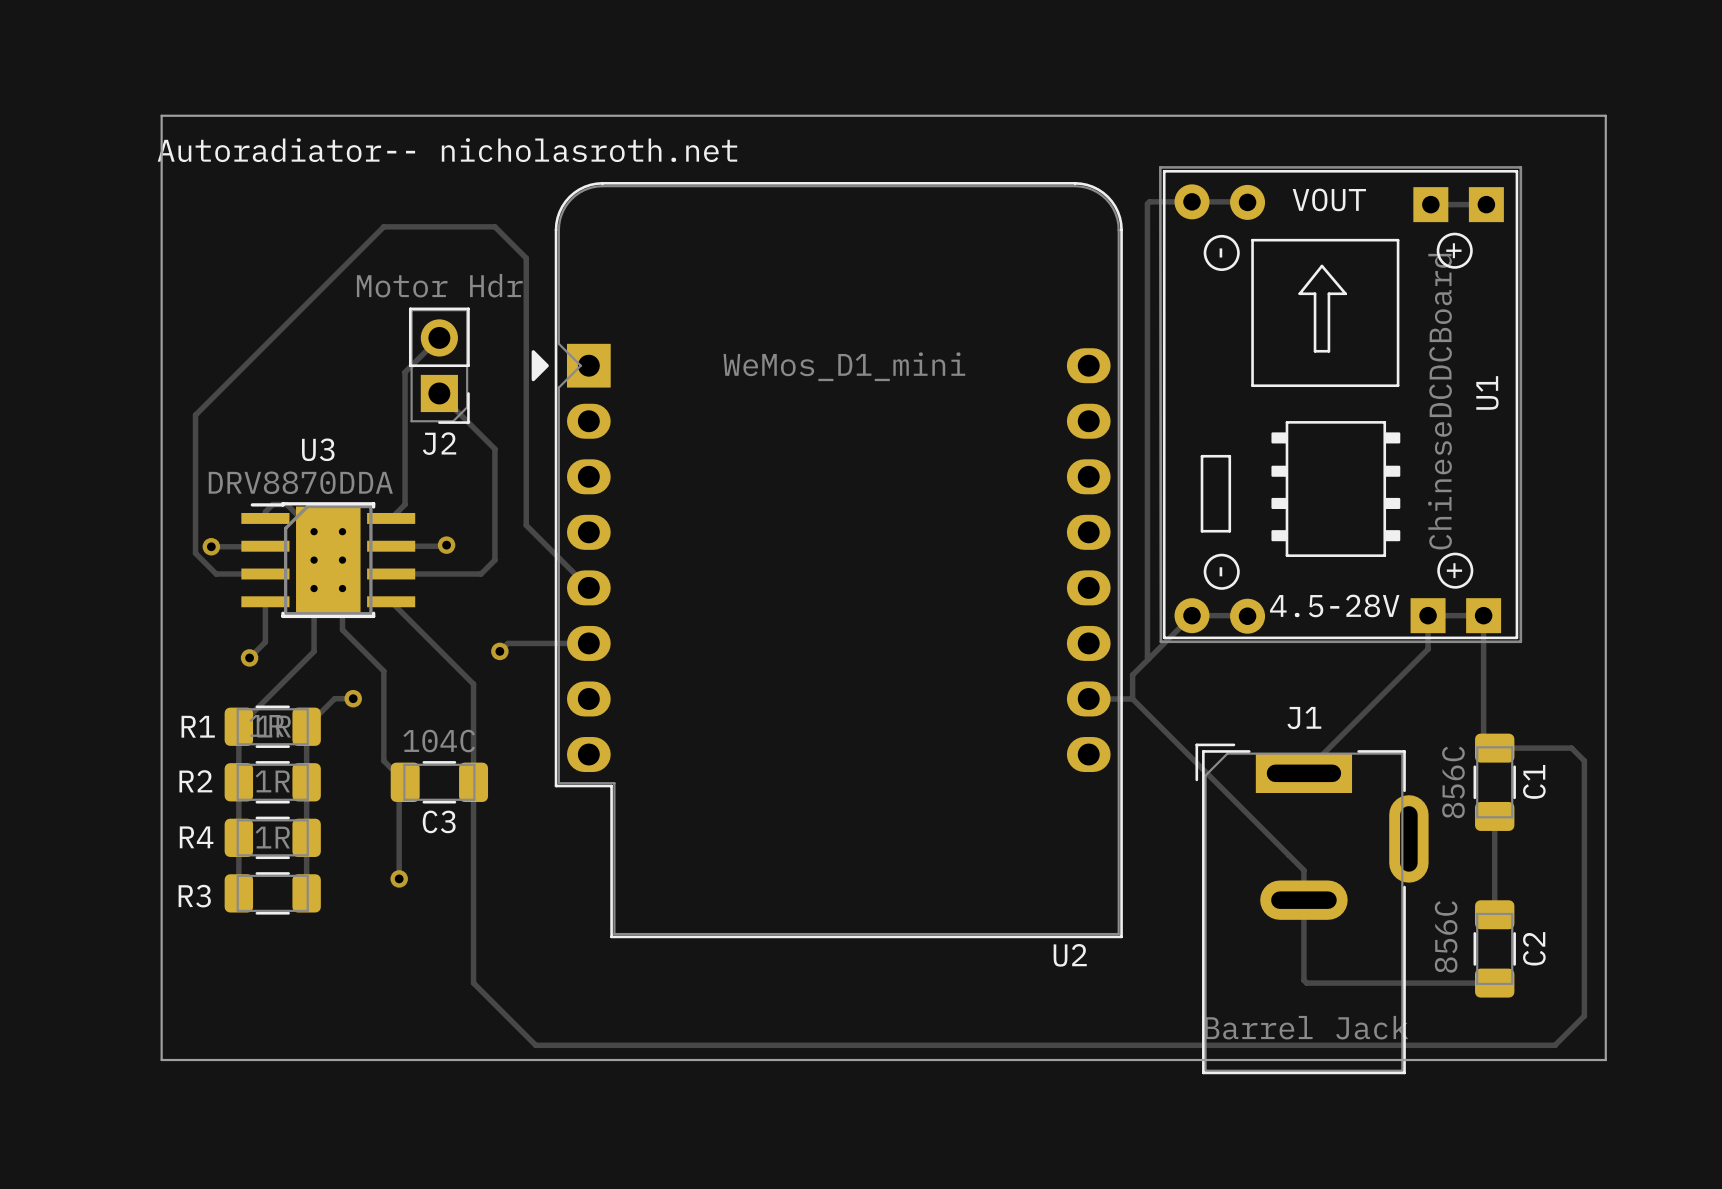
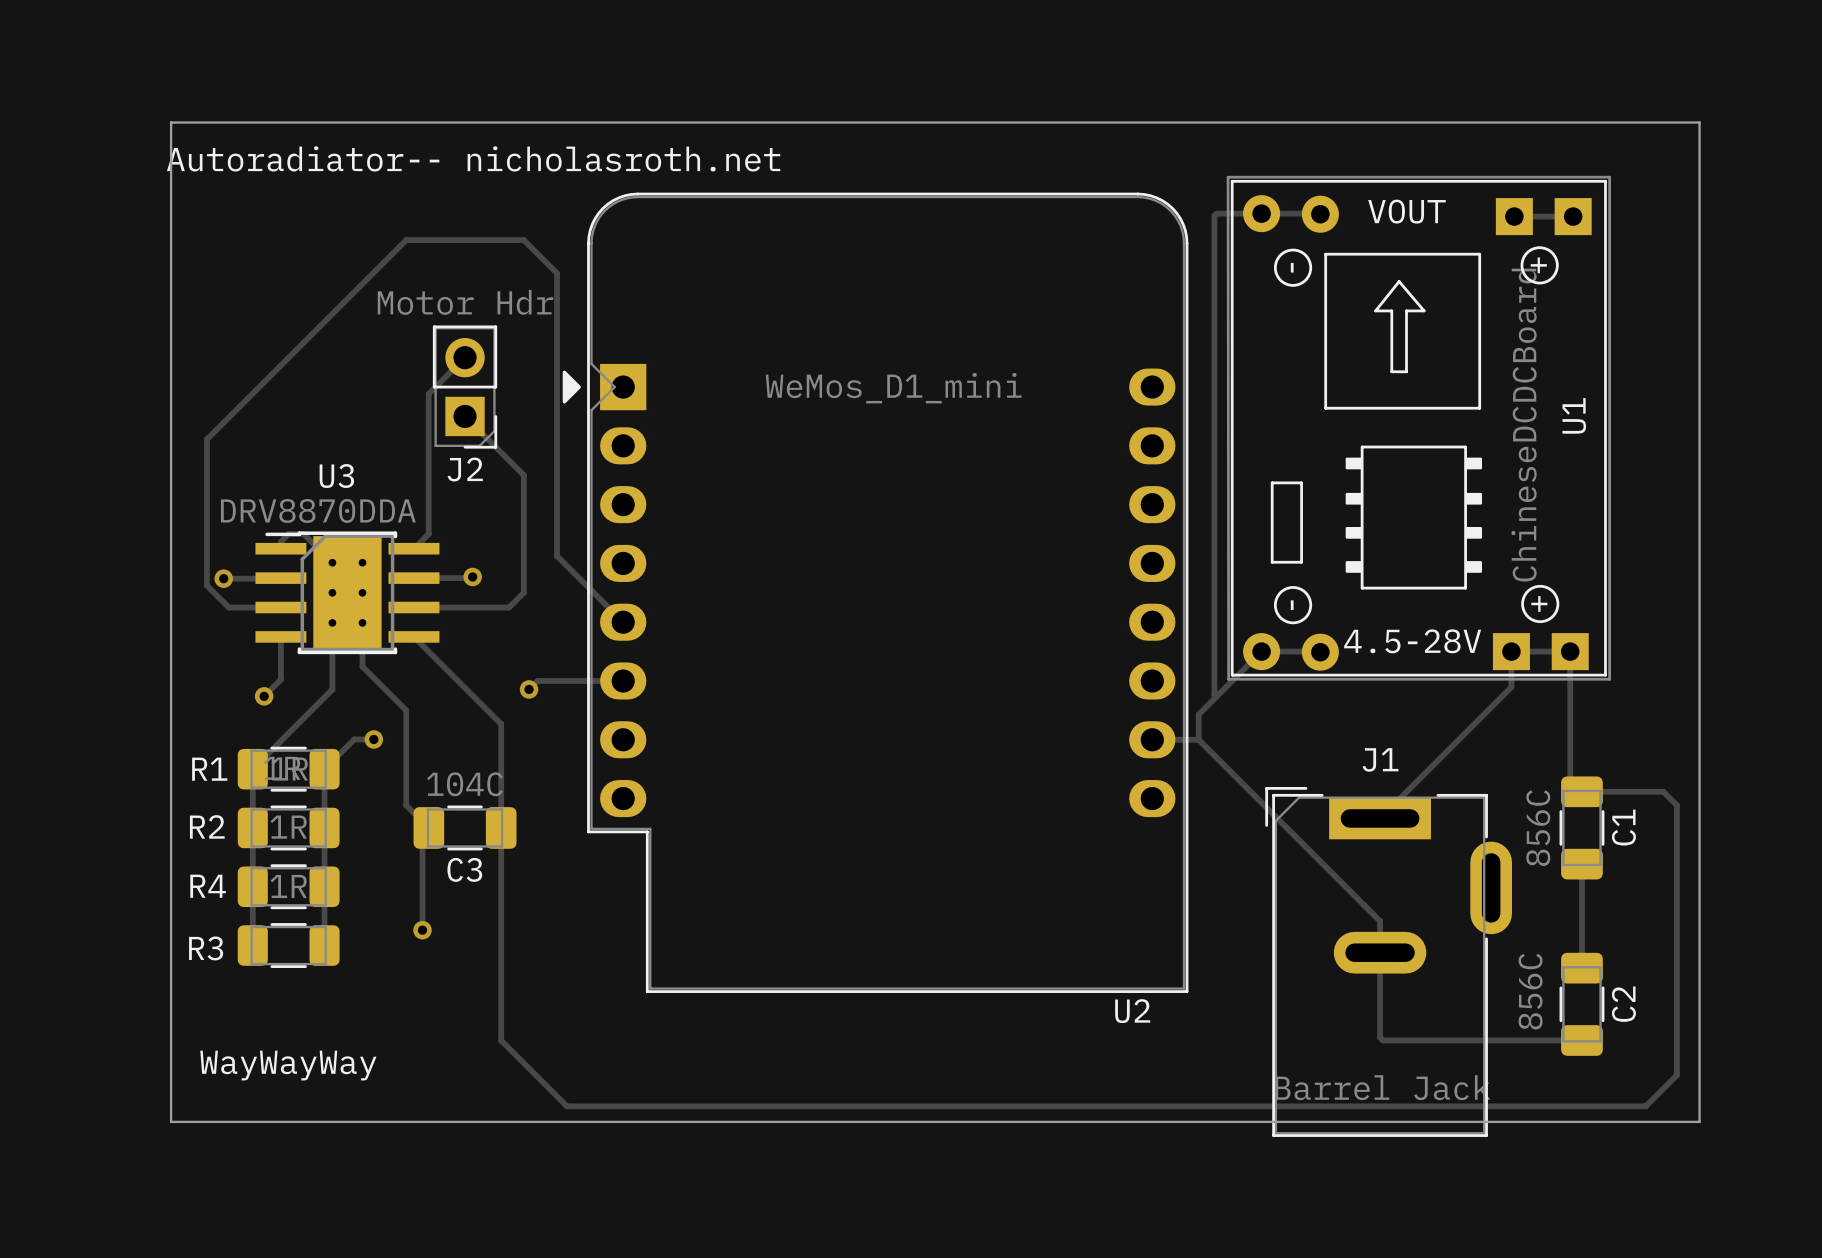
text: none -> WayWayWay (288, 1065)

